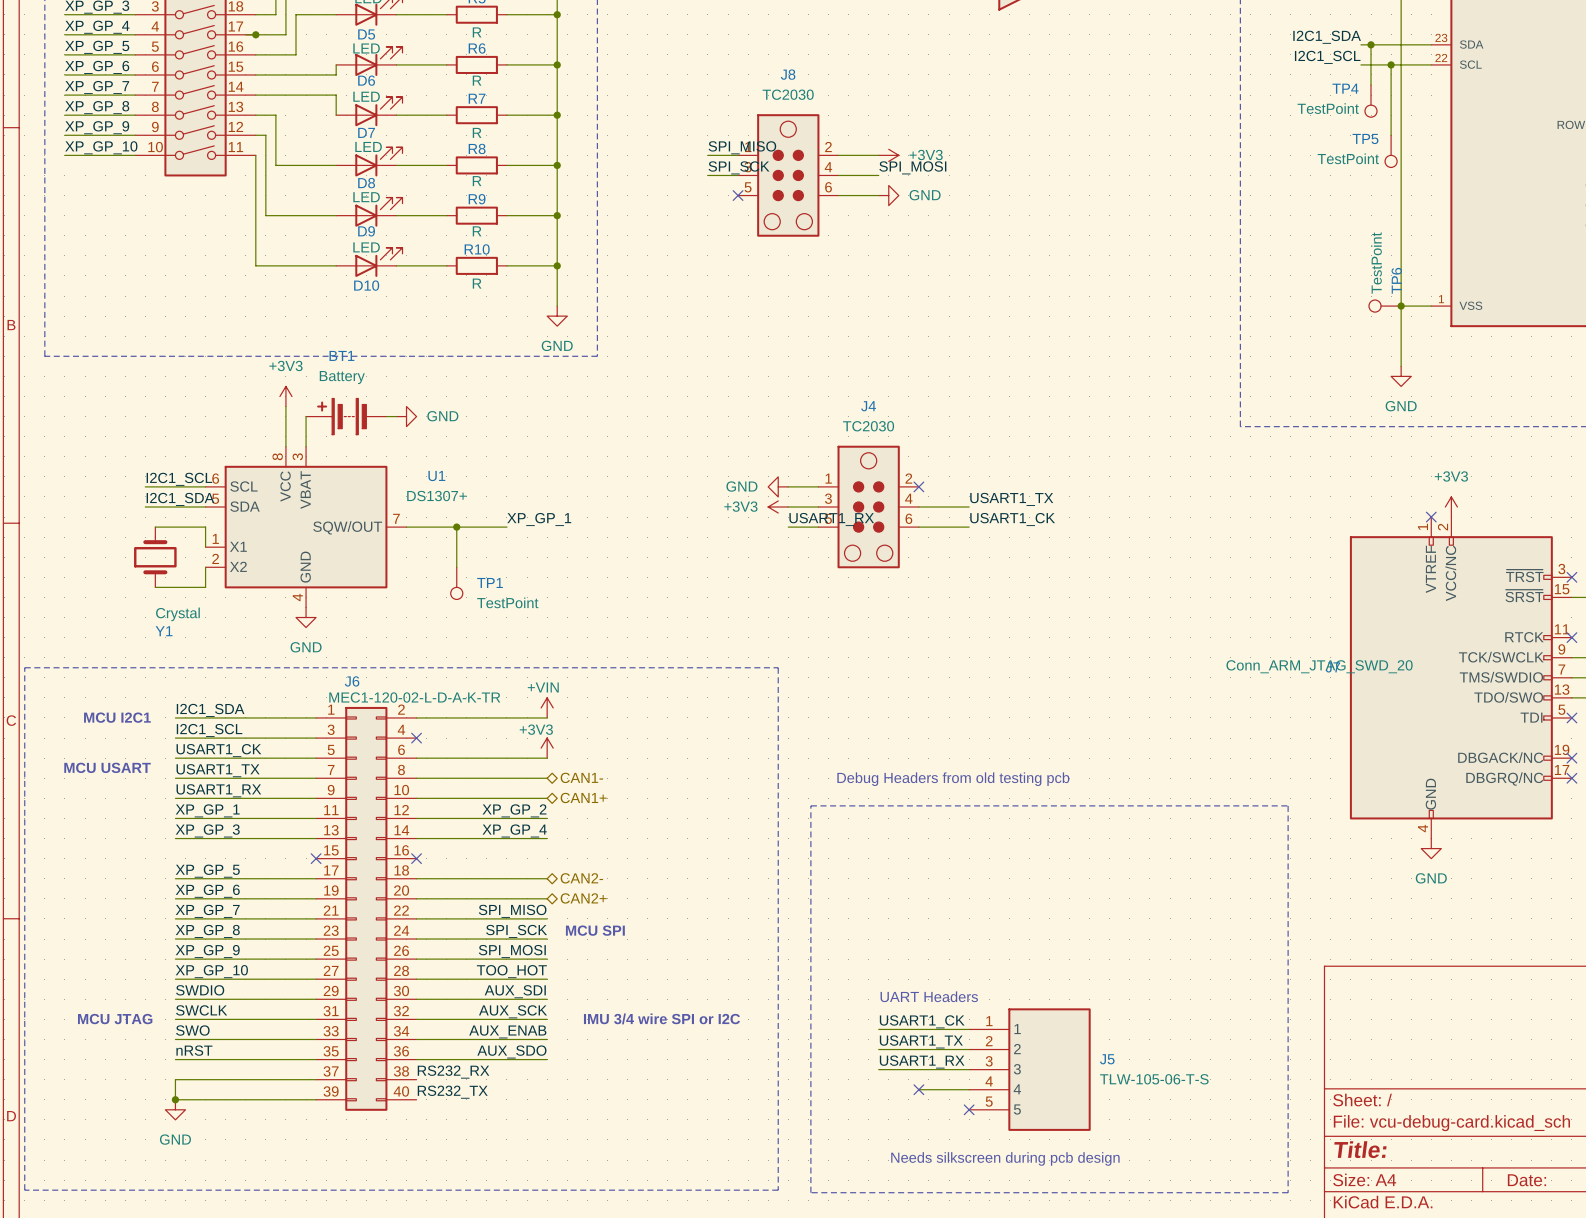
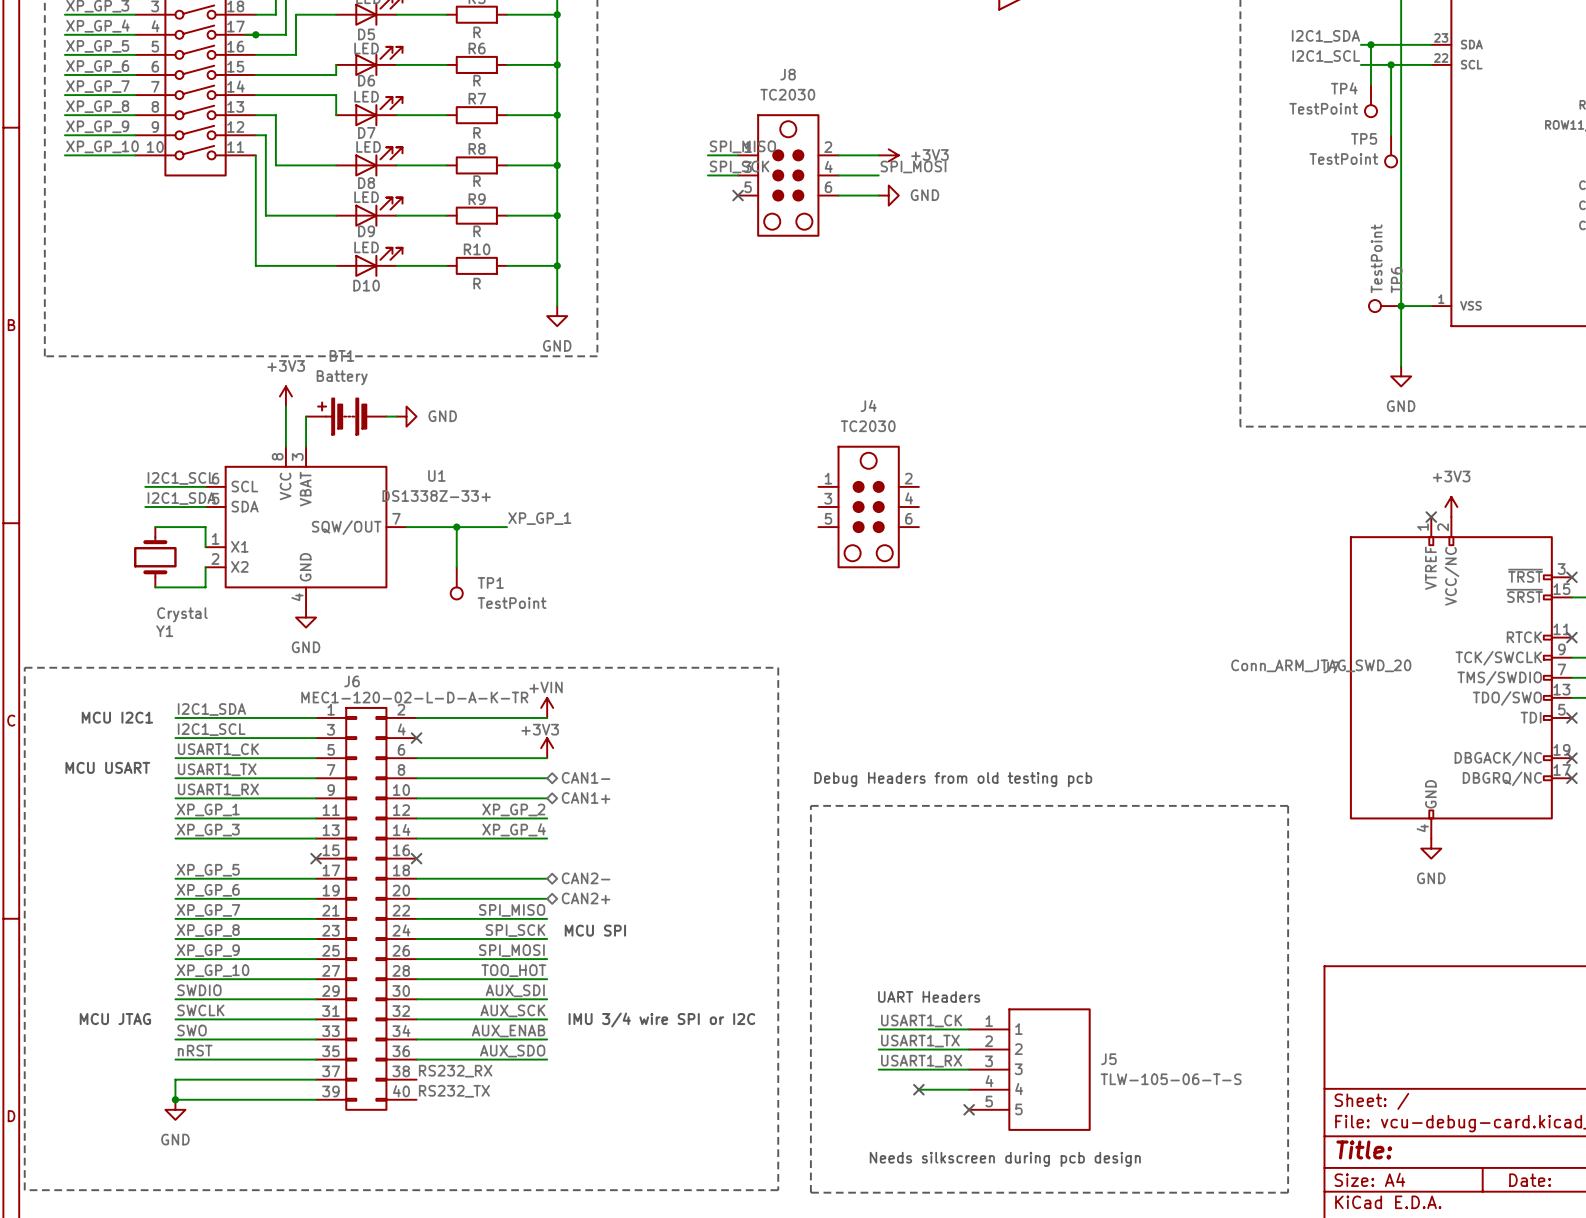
power symbol: GND (778, 486) -> none
wire: (788, 486) (818, 486) -> none
no-connect mark: (918, 486) -> none
U1 value: DS1307+ (436, 496) -> DS1338Z-33+ (436, 496)
label: USART1_TX (1011, 499) -> none
power symbol: +3V3 (778, 507) -> none
wire: (788, 507) (818, 507) -> none
wire: (918, 507) (969, 507) -> none
label: USART1_RX (831, 519) -> none
label: USART1_CK (1012, 519) -> none
wire: (788, 527) (818, 527) -> none
wire: (918, 527) (969, 527) -> none

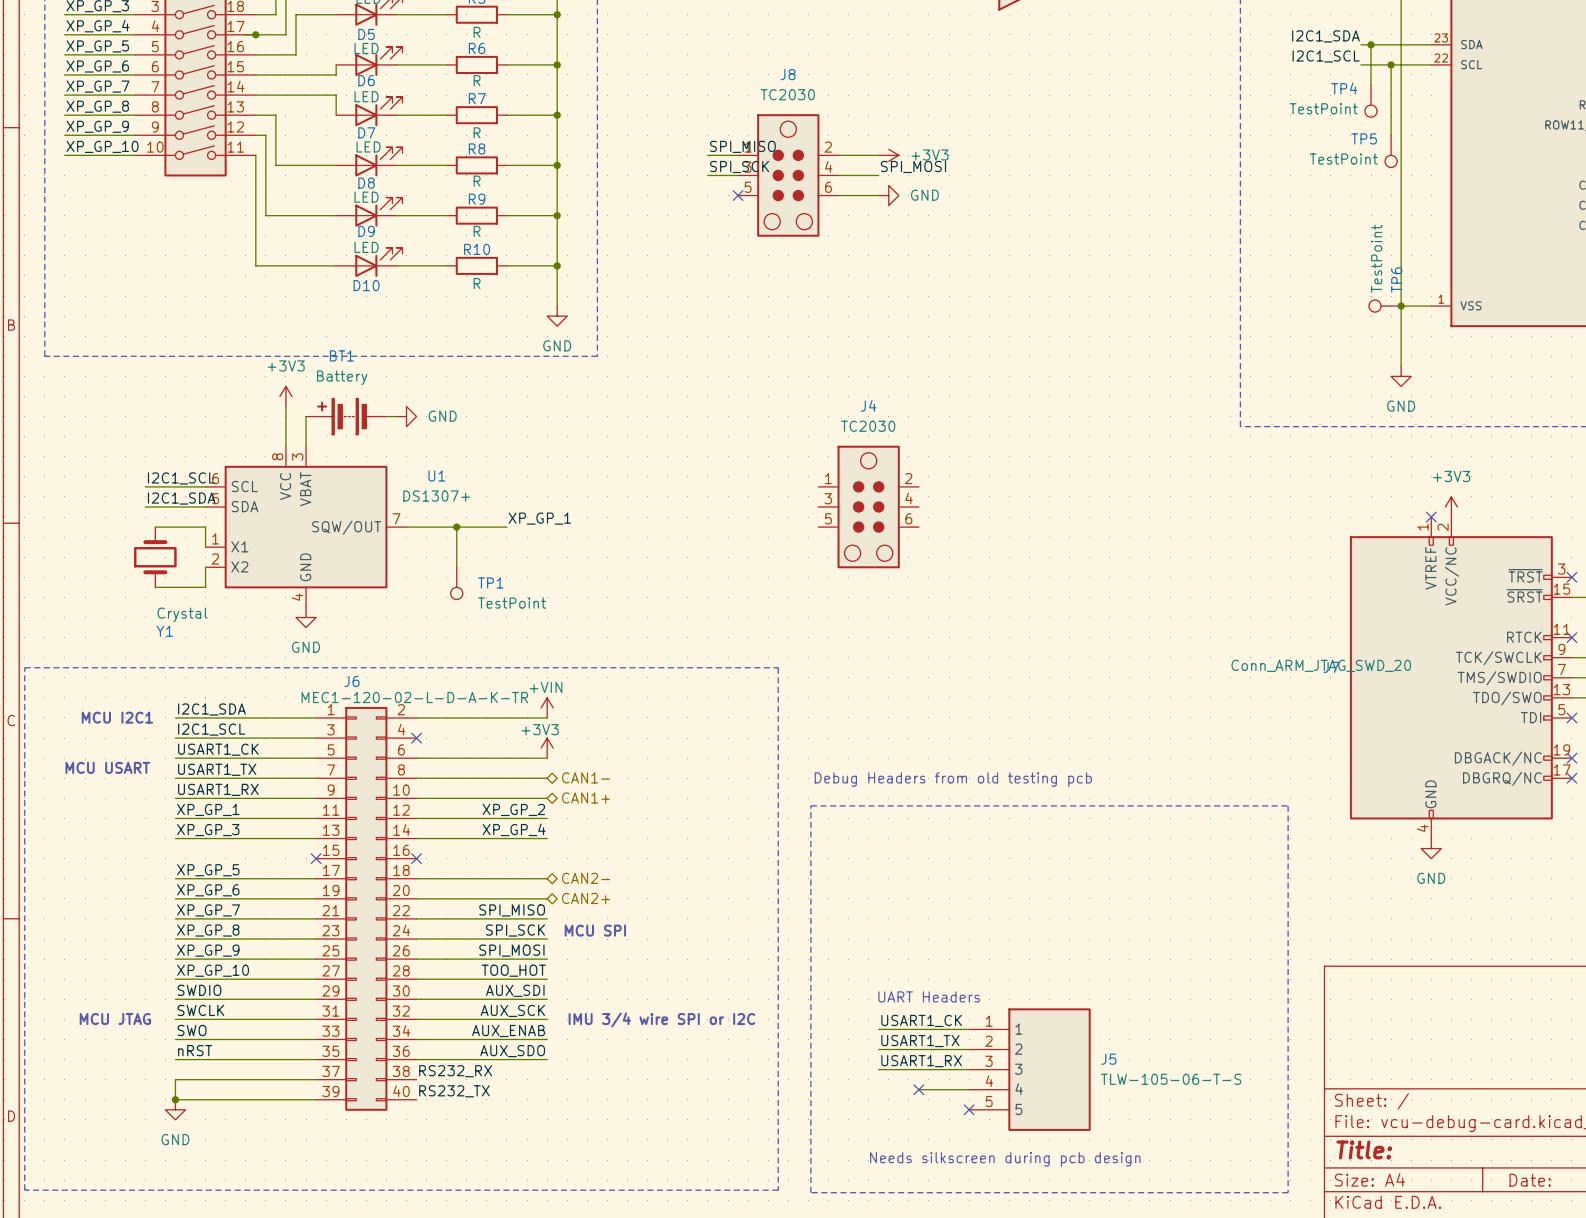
U1 value: DS1338Z-33+ (436, 496) -> DS1307+ (436, 496)

